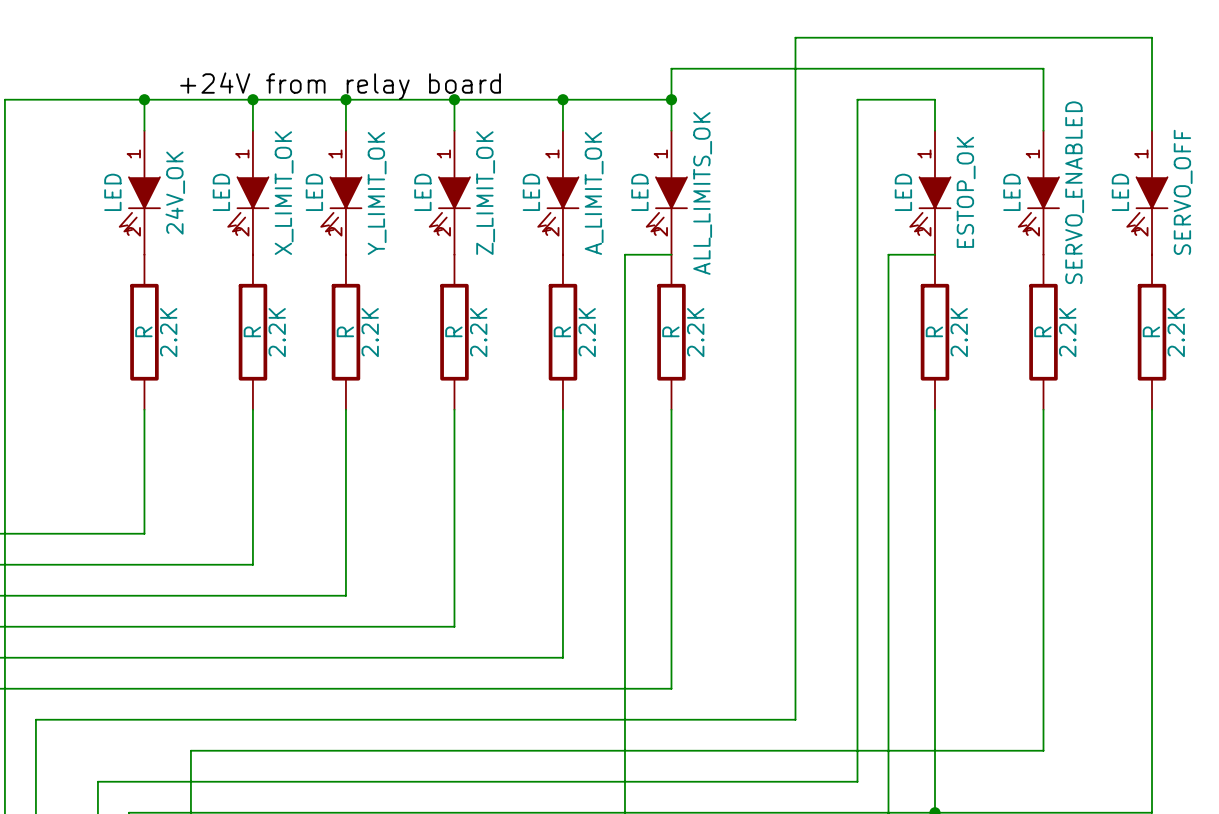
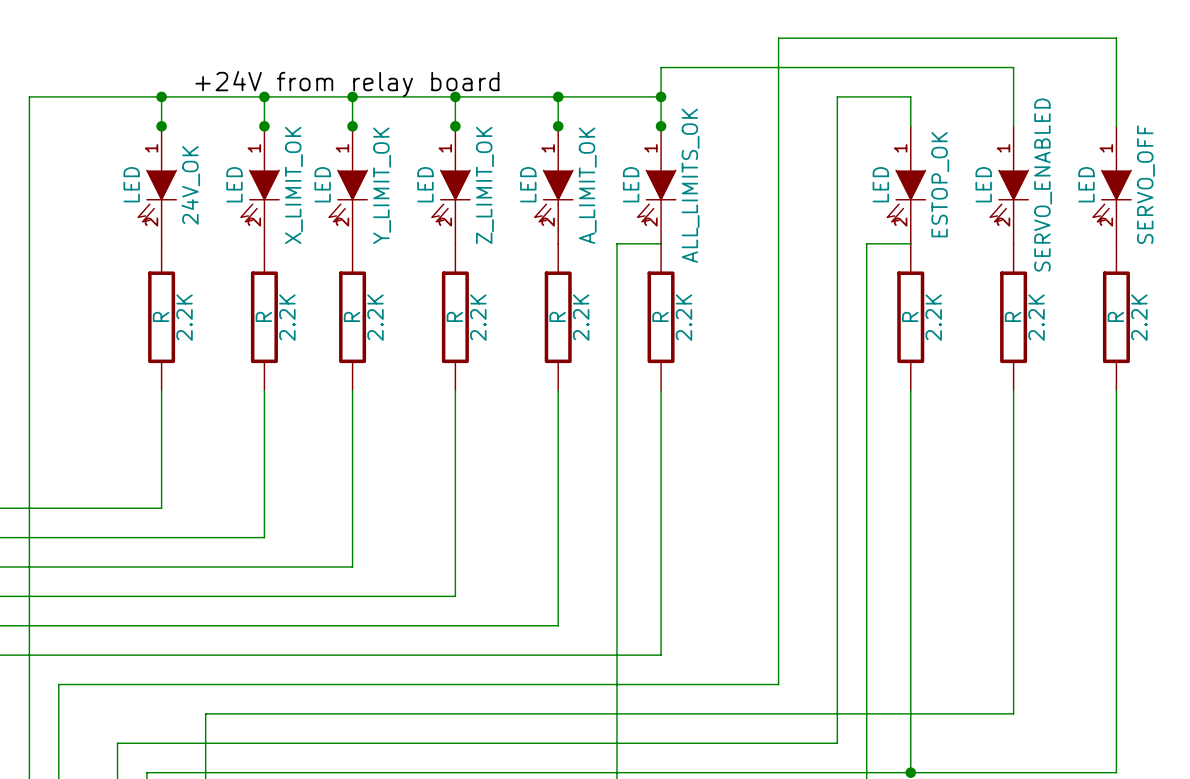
junction: none -> (161, 126)
junction: none -> (264, 126)
junction: none -> (352, 126)
junction: none -> (455, 126)
junction: none -> (558, 126)
junction: none -> (661, 126)

